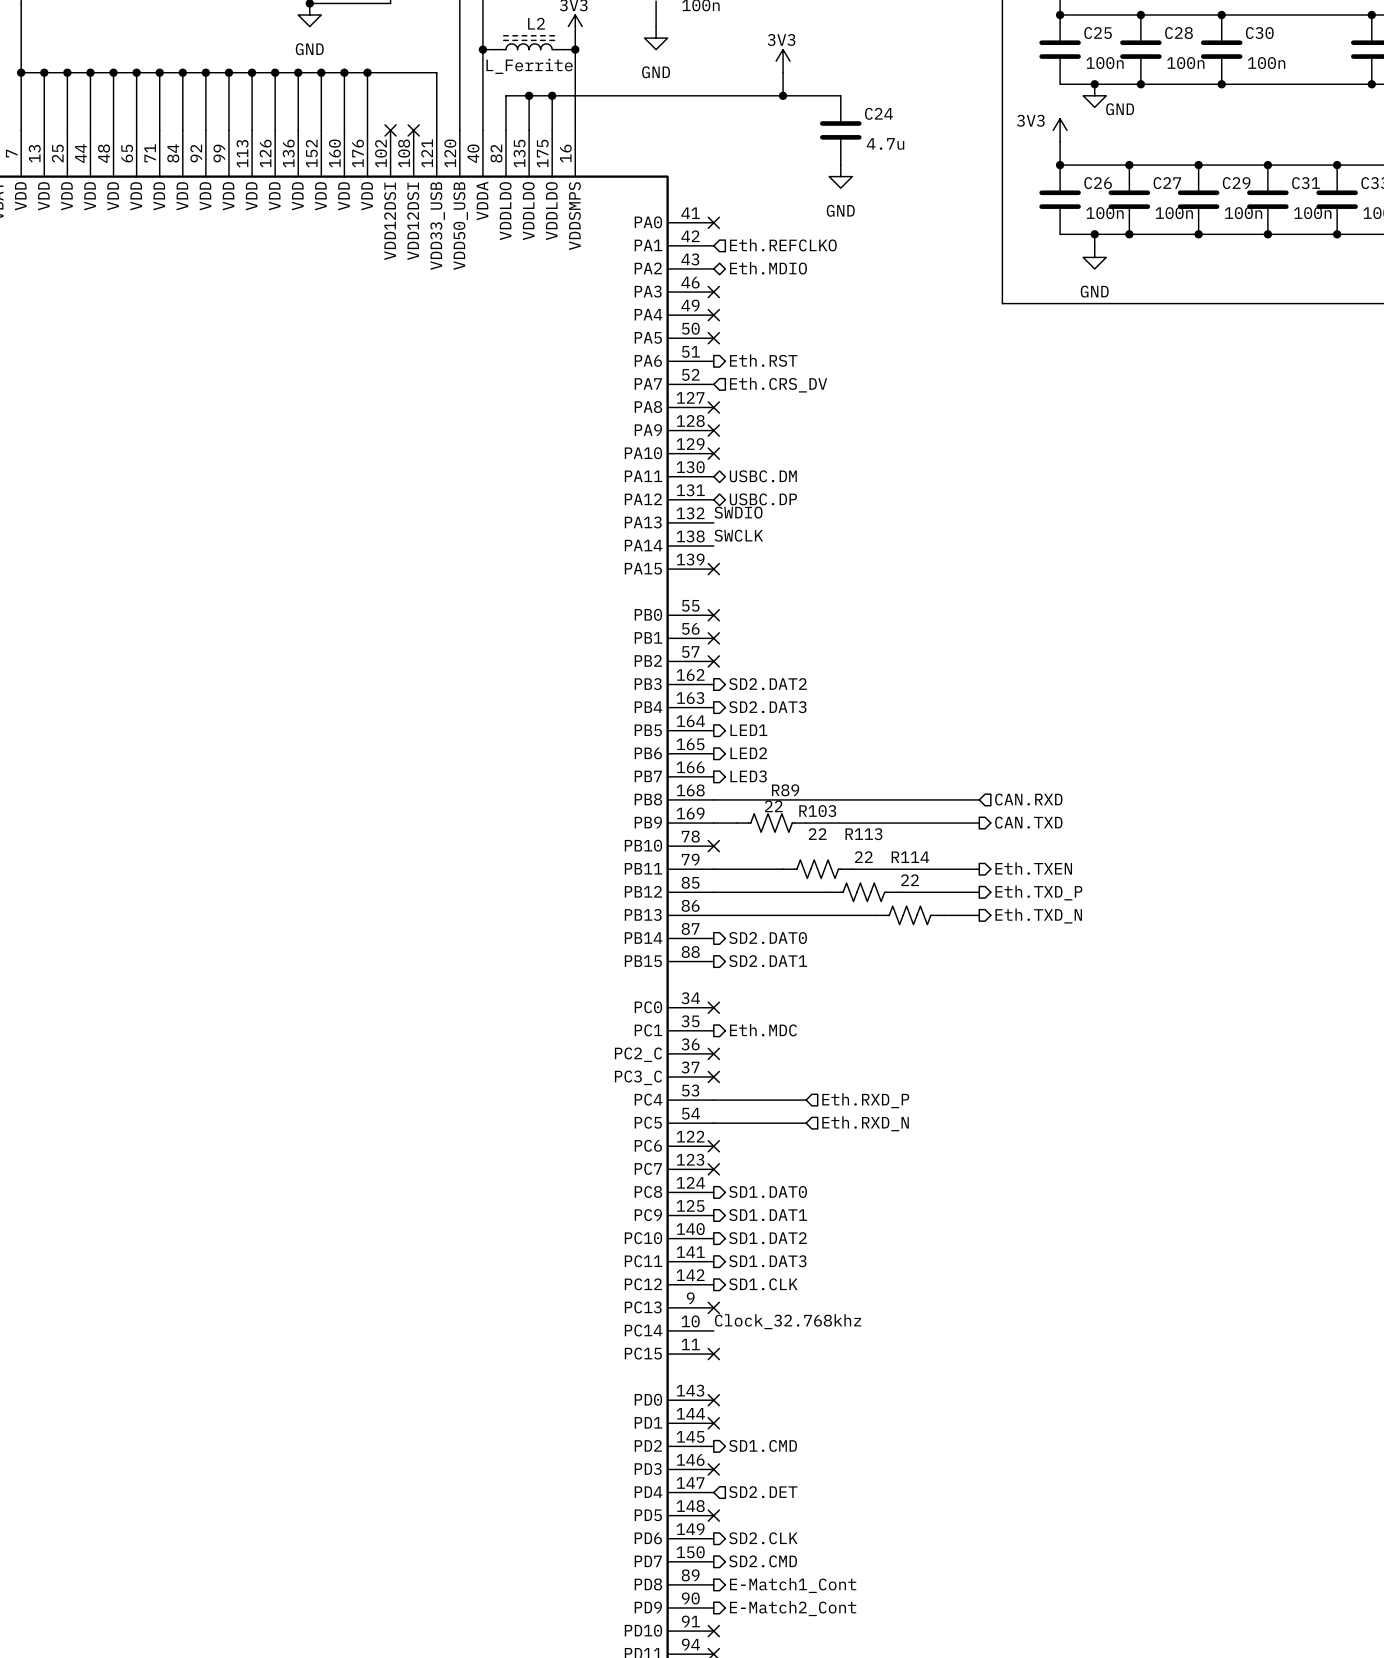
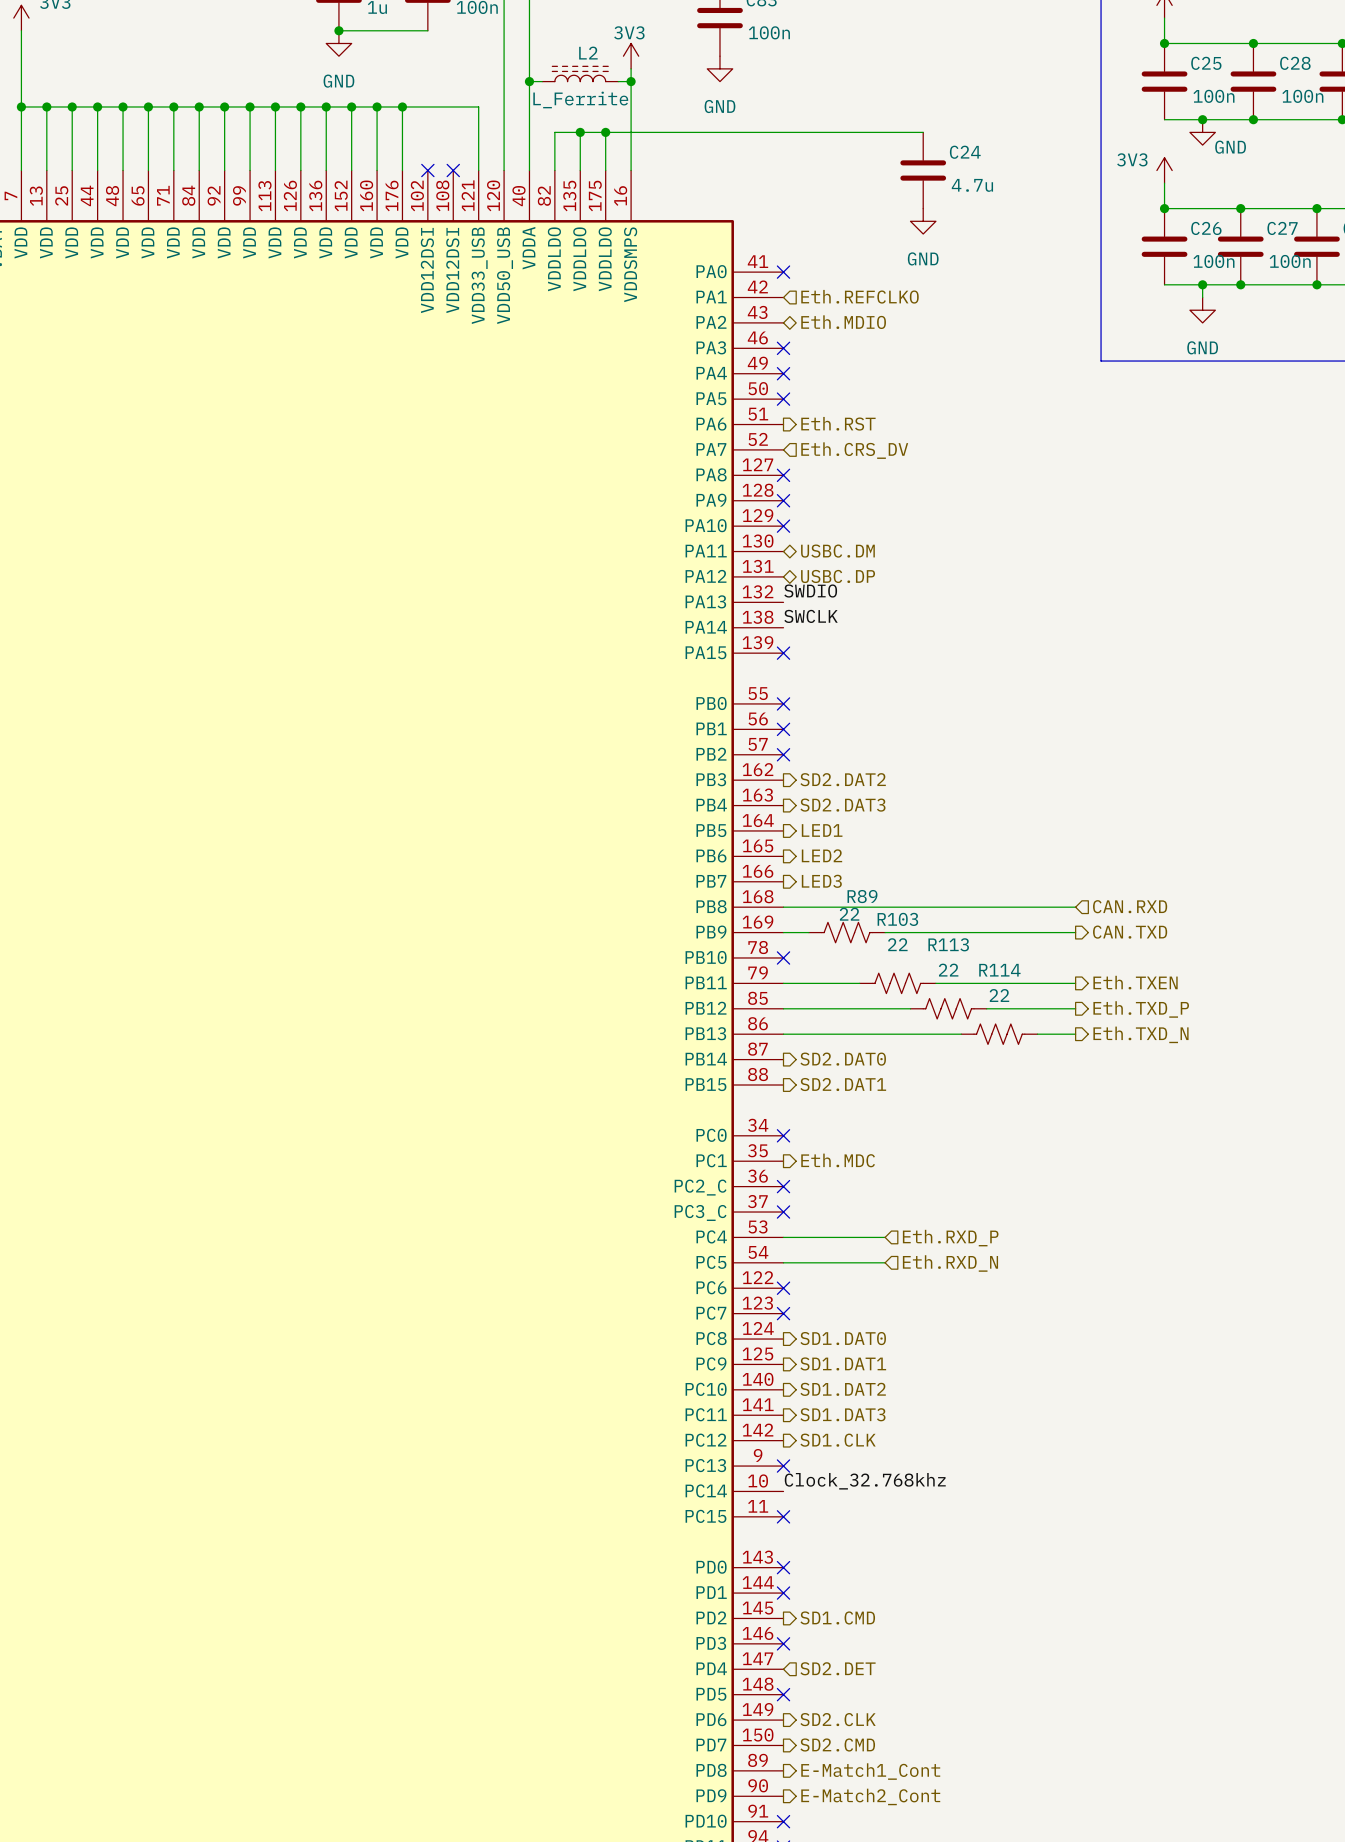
power symbol: 3V3 (783, 61) -> none
wire: (783, 72) (783, 95) -> none
junction: (783, 95) -> none

